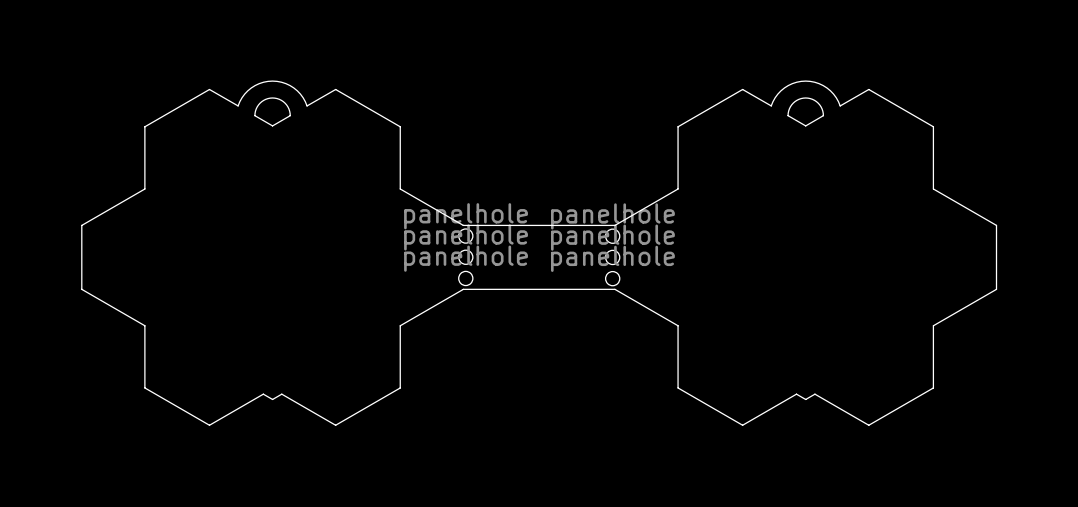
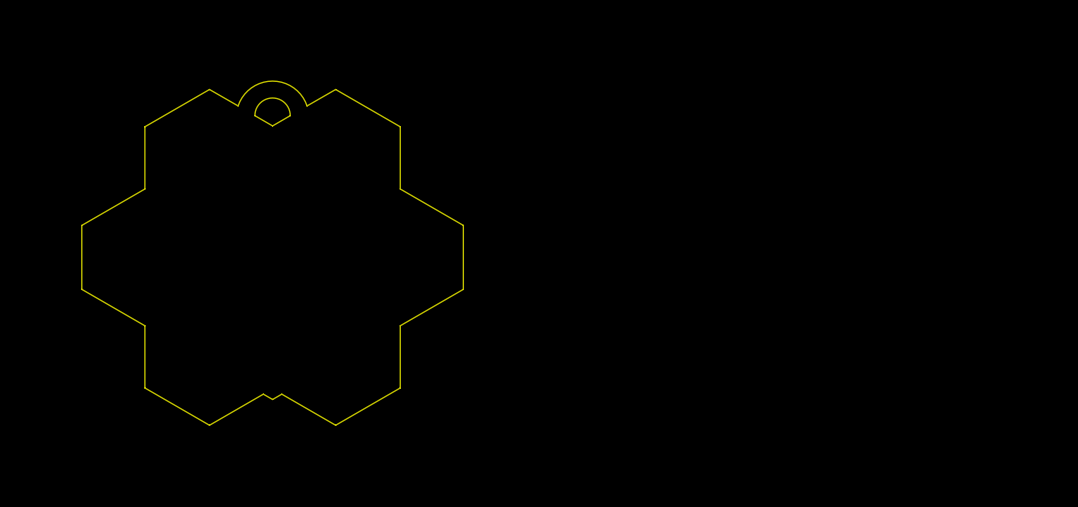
board edge: (788, 115) (805, 125) (823, 115) (818, 103) (805, 97) (793, 103) (788, 115) -> none
board edge: (463, 225) (614, 225) (678, 188) (678, 126) (742, 89) (771, 105) (775, 97) (784, 87) (792, 83) (805, 81) (819, 83) (826, 87) (833, 94) (840, 105) (868, 89) (933, 126) (933, 188) (996, 225) (996, 289) (933, 325) (933, 387) (868, 425) (814, 394) (805, 399) (796, 394) (742, 425) (678, 387) (678, 325) (614, 289) (463, 289) -> (463, 225) (463, 289)
part: panelhole (465, 236) -> none
part: panelhole (612, 236) -> none
part: panelhole (465, 257) -> none
part: panelhole (612, 257) -> none
part: panelhole (465, 278) -> none
part: panelhole (612, 278) -> none

